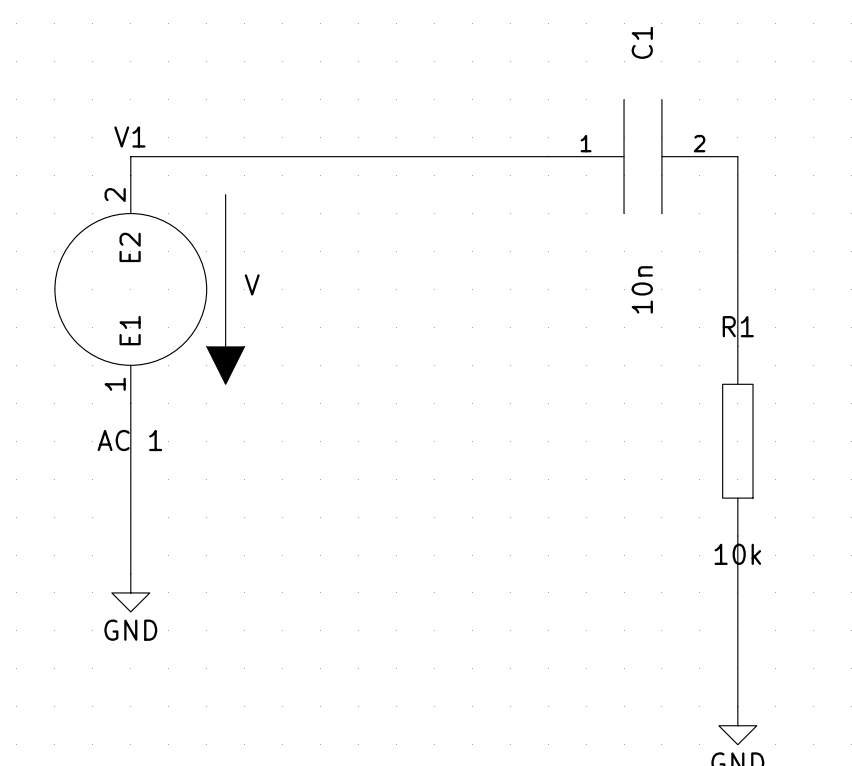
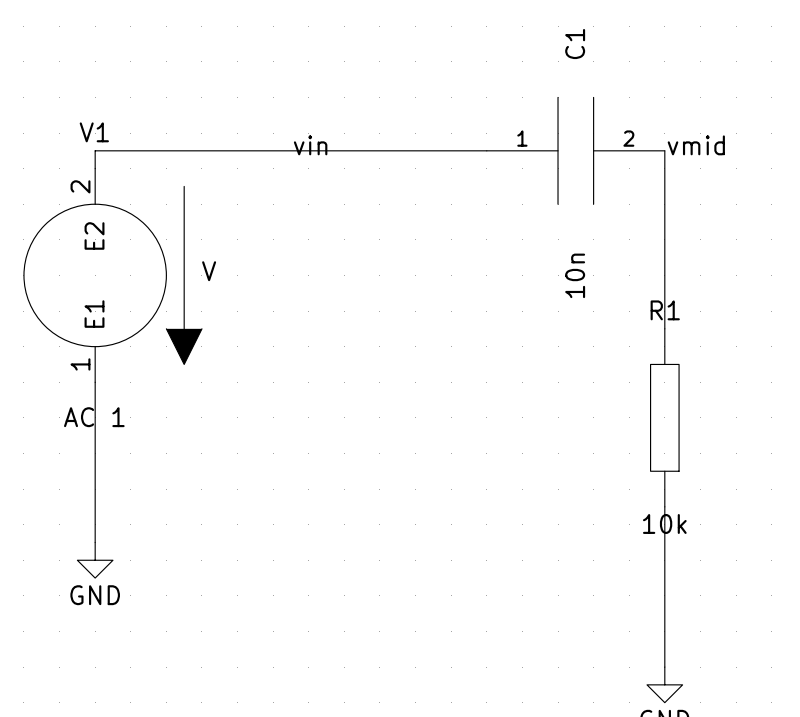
label: none -> vin (310, 145)
label: none -> vmid (696, 145)

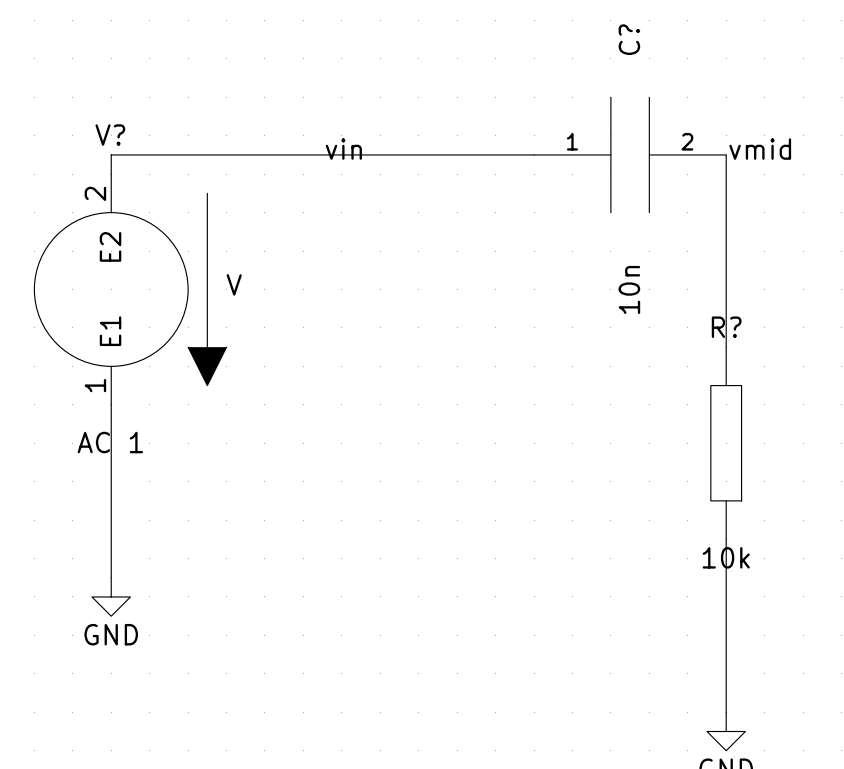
C1 name: C1 (575, 44) -> C? (629, 39)
V1 name: V1 (94, 132) -> V? (110, 135)
R1 name: R1 (665, 310) -> R? (726, 327)

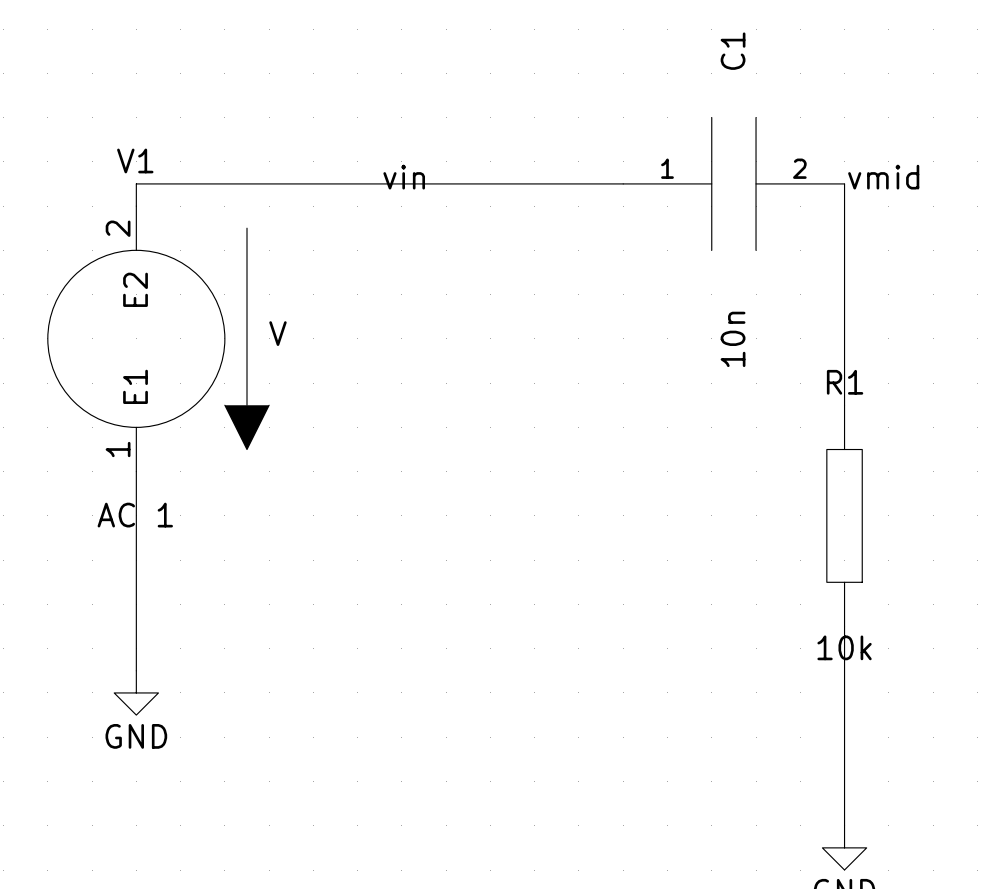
C? name: C? (629, 39) -> C1 (733, 51)
V? name: V? (110, 135) -> V1 (135, 160)
R? name: R? (726, 327) -> R1 (845, 382)

